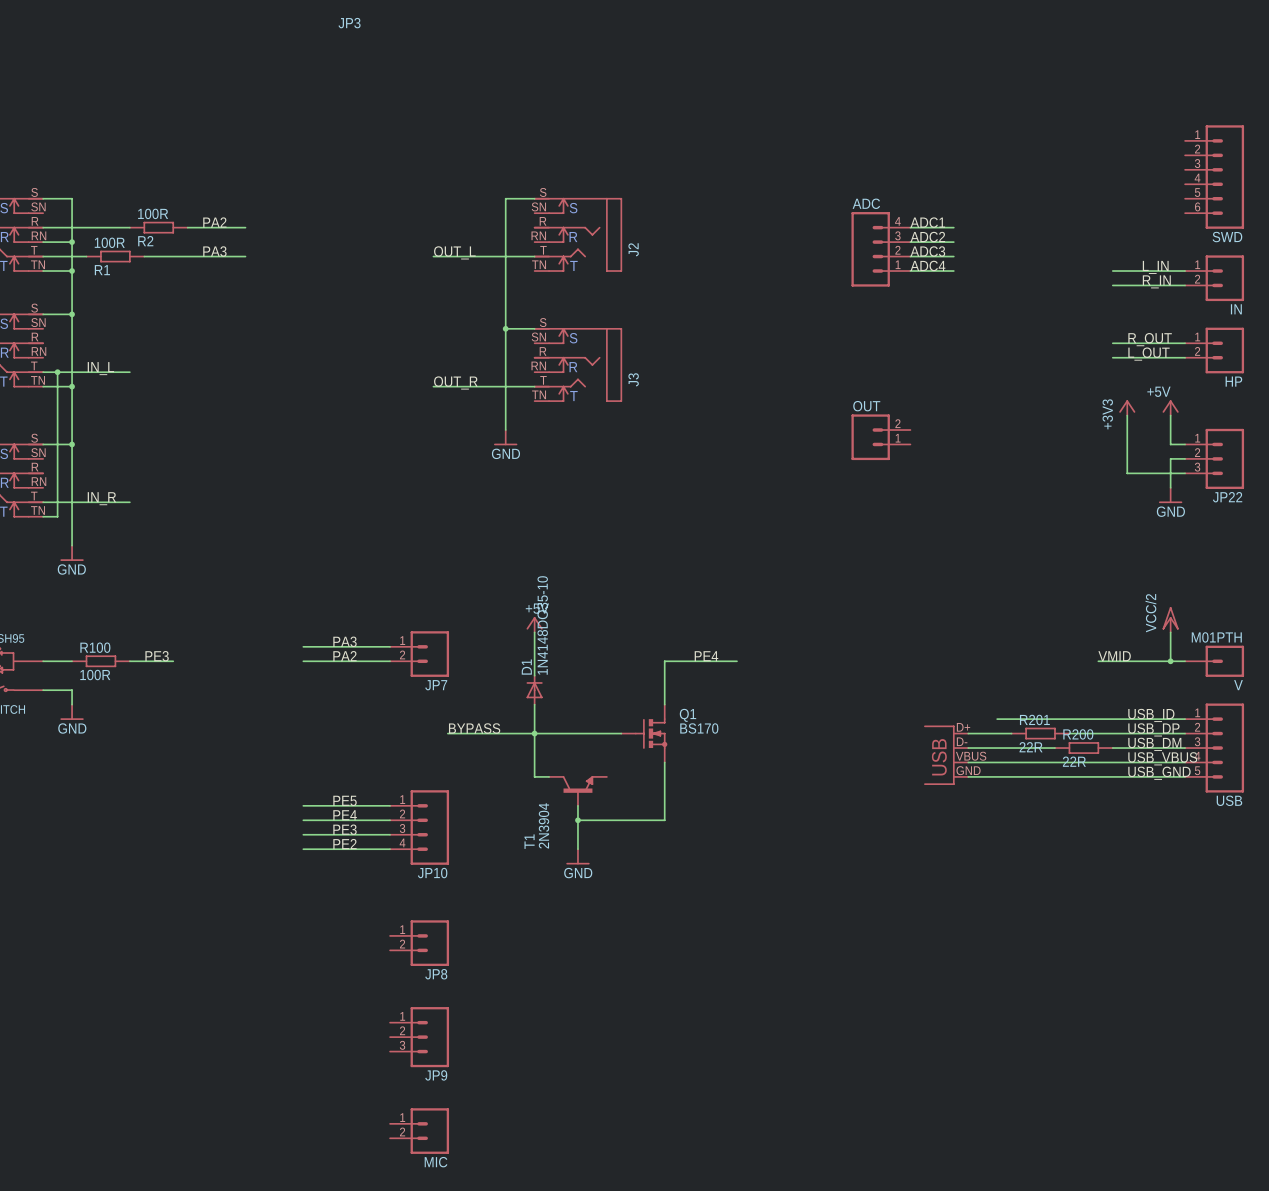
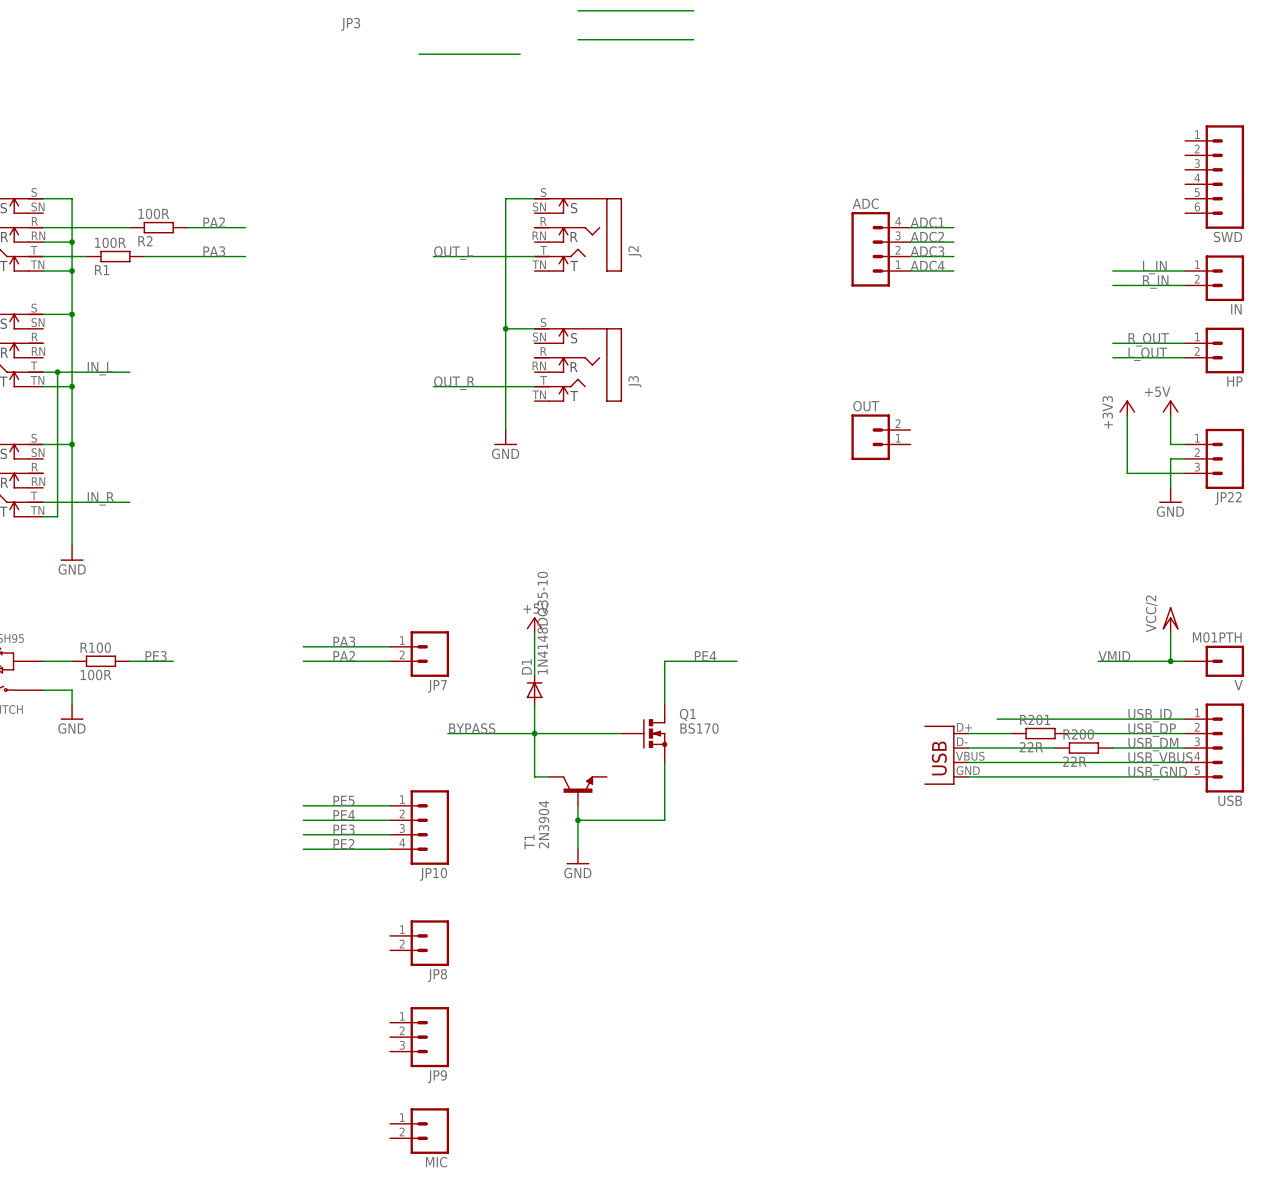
wire: none -> (577, 10) (693, 10)
wire: none -> (577, 39) (693, 39)
wire: none -> (418, 54) (520, 54)

